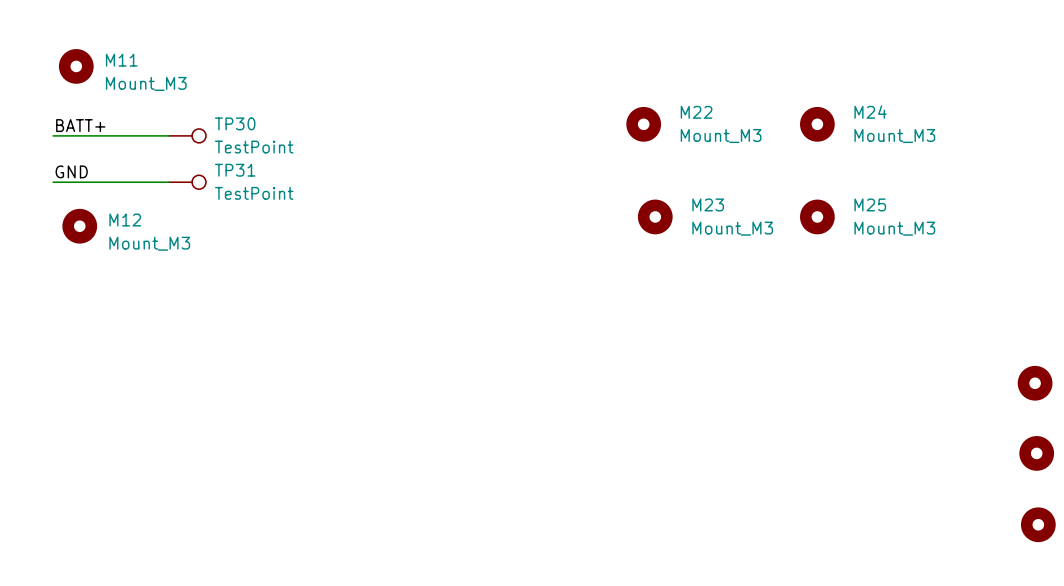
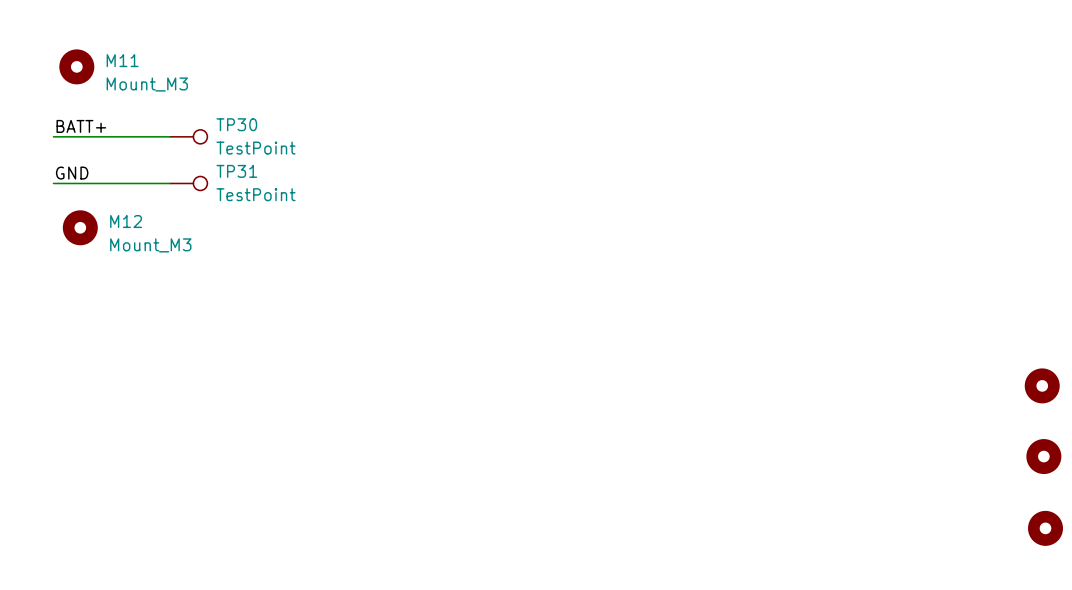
M22: Mount_M3 (643, 124) -> none
M24: Mount_M3 (817, 124) -> none
M23: Mount_M3 (655, 216) -> none
M25: Mount_M3 (817, 216) -> none

